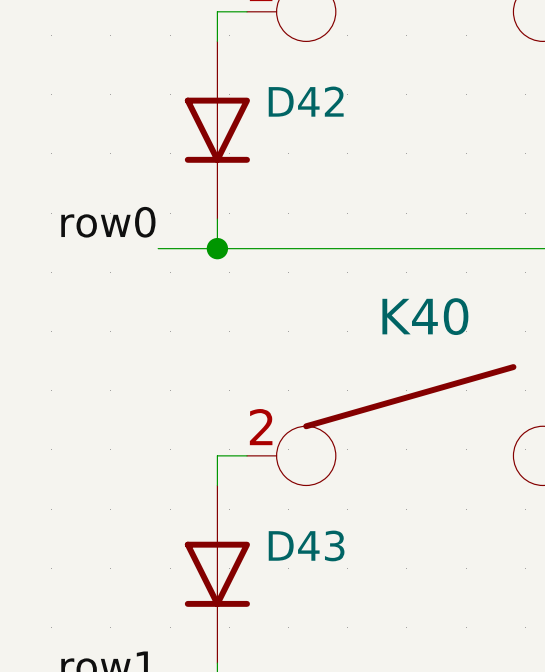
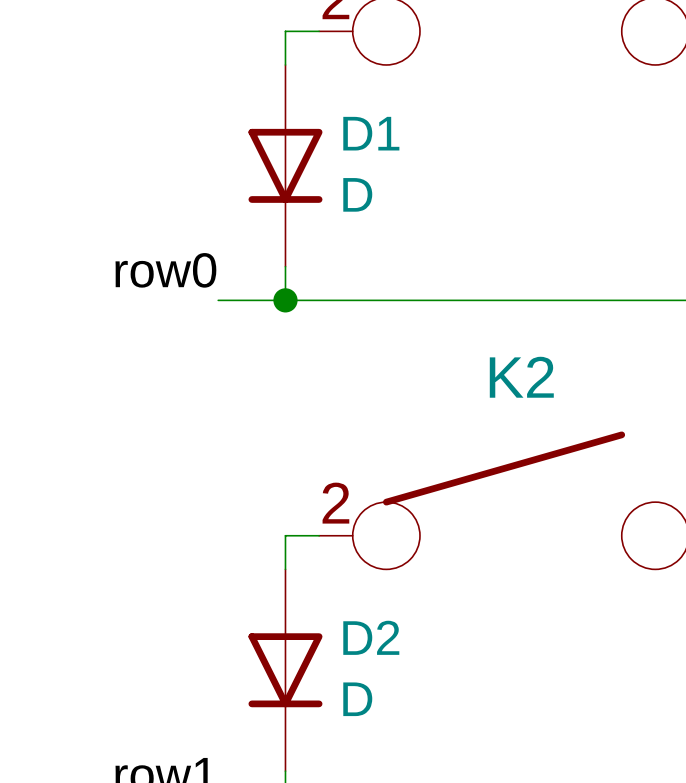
D42 name: D42 (306, 101) -> D1 (371, 133)
D42 value: none -> D (357, 194)
K40 name: K40 (425, 316) -> K2 (521, 377)
D43 name: D43 (306, 545) -> D2 (371, 637)
D43 value: none -> D (357, 699)

